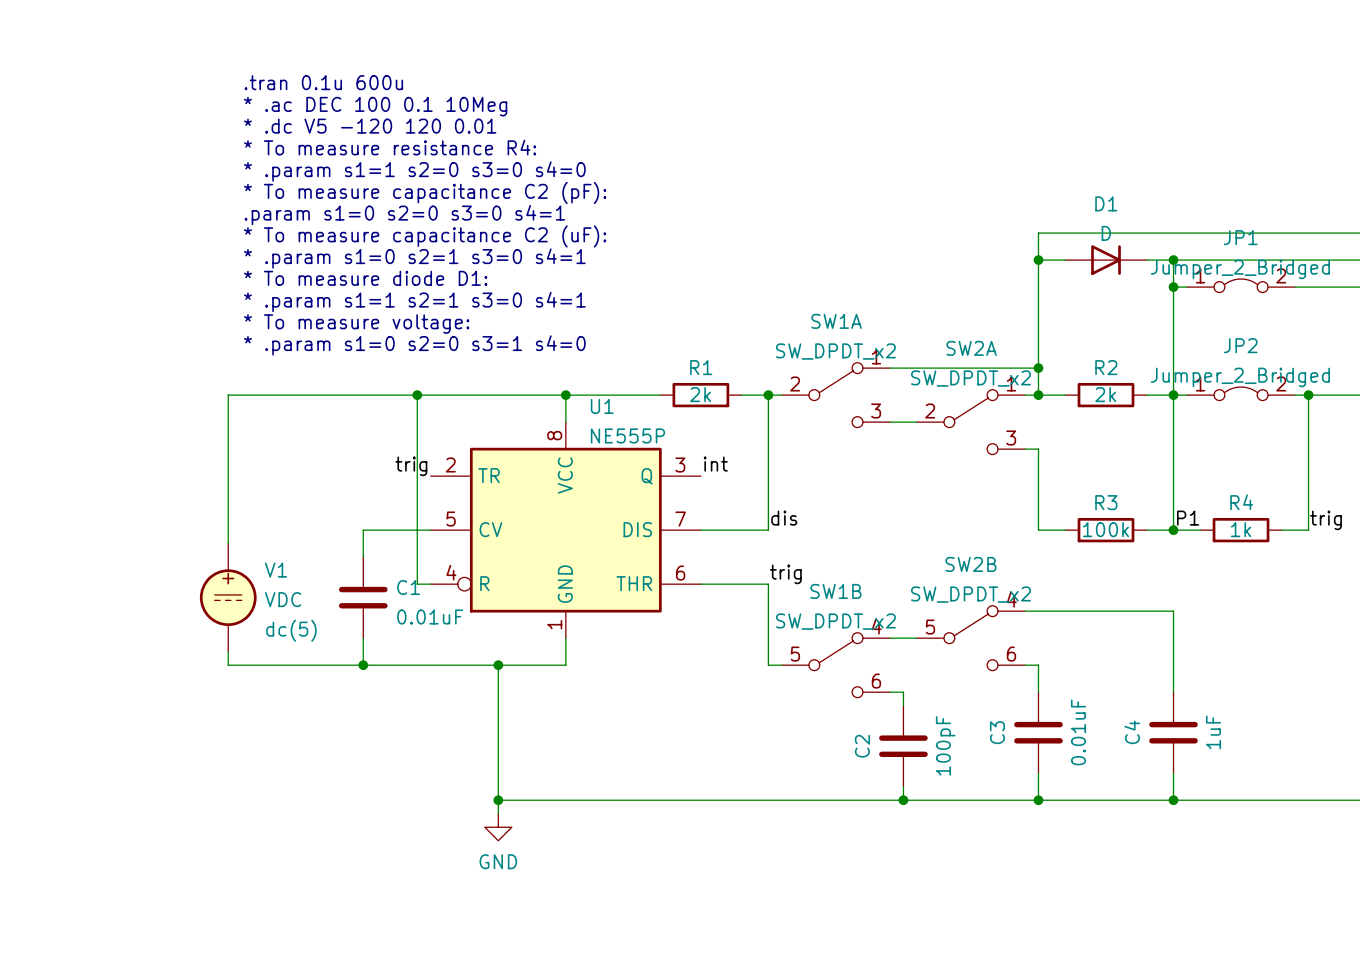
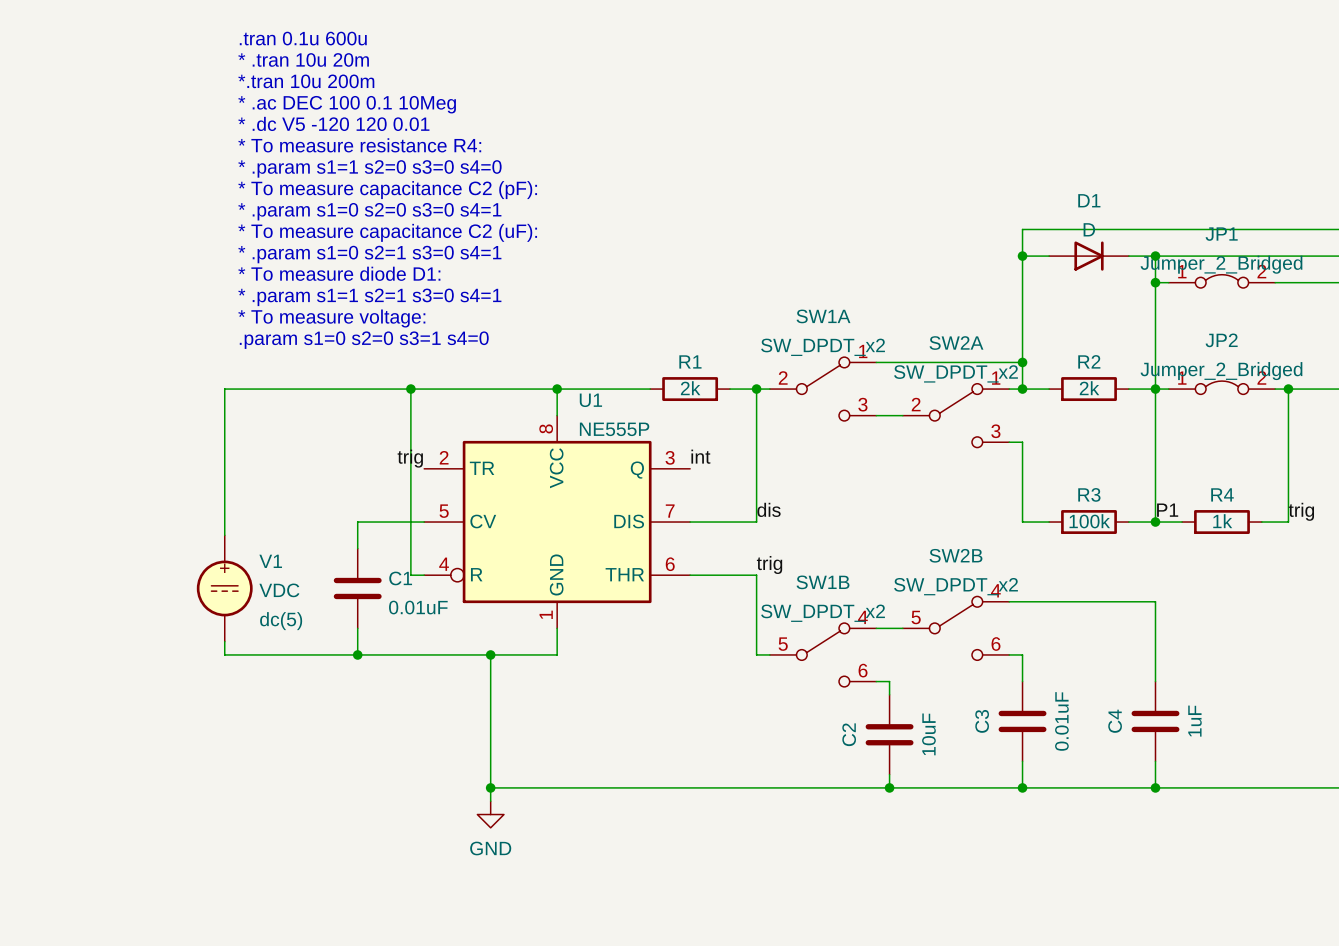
text: none -> .tran 0.1u 600u (303, 38)
text: none -> * .tran 10u 20m (303, 59)
text: .tran 0.1u 600u (323, 82) -> *.tran 10u 200m (306, 81)
text: .param s1=0 s2=0 s3=0 s4=1 (404, 215) -> * .param s1=0 s2=0 s3=0 s4=1 (369, 211)
text: * .param s1=0 s2=0 s3=1 s4=0 (414, 345) -> .param s1=0 s2=0 s3=1 s4=0 (364, 340)
C2 value: 100pF (945, 745) -> 10uF (928, 734)

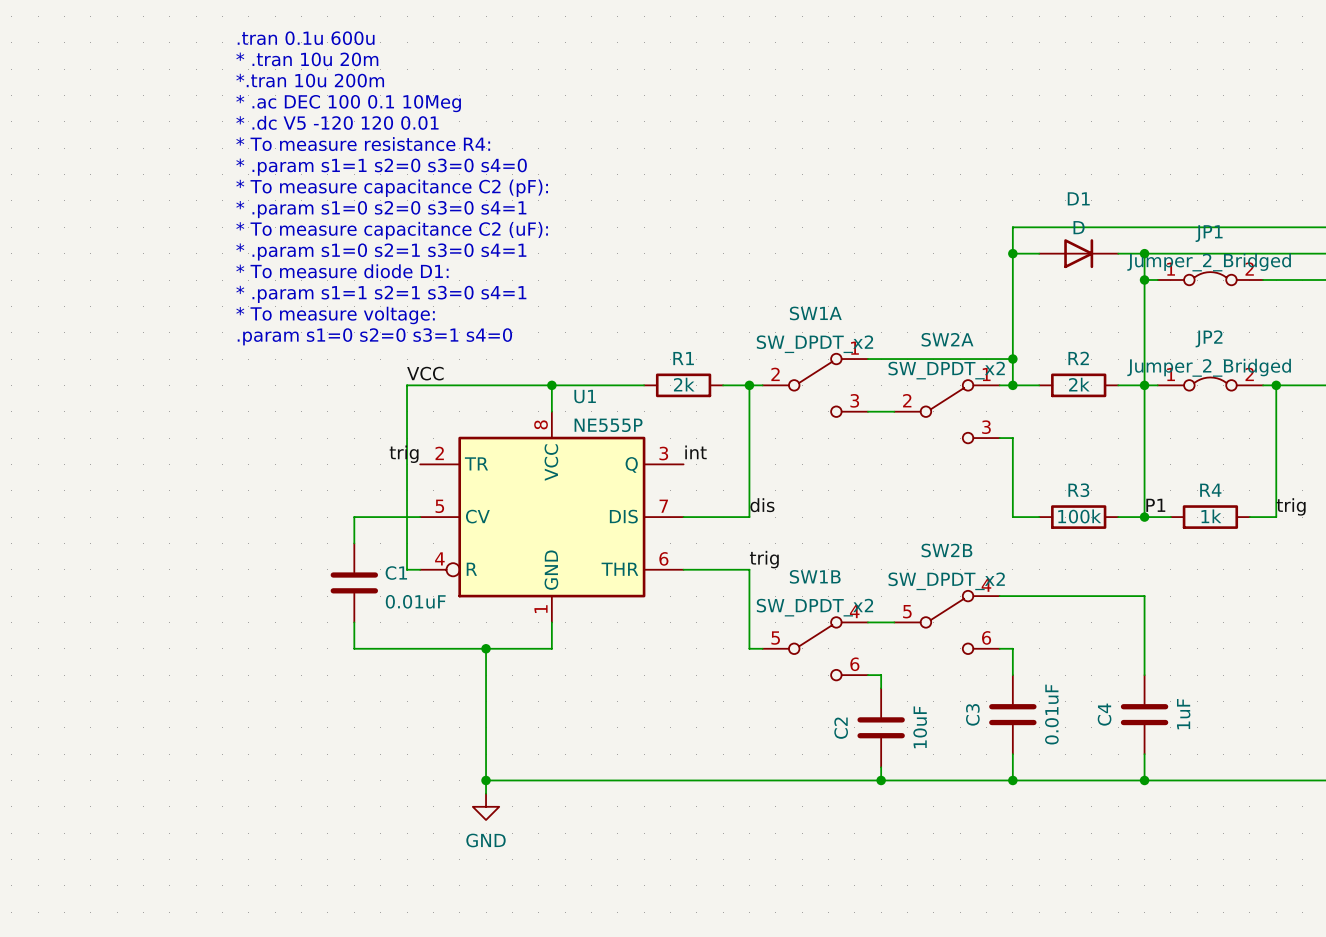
label: none -> VCC (425, 373)
wire: (410, 389) (224, 389) (224, 535) -> none
junction: (410, 389) -> none
V1: VDC (224, 588) -> none
wire: (224, 641) (224, 654) (357, 654) -> none
junction: (357, 654) -> none

